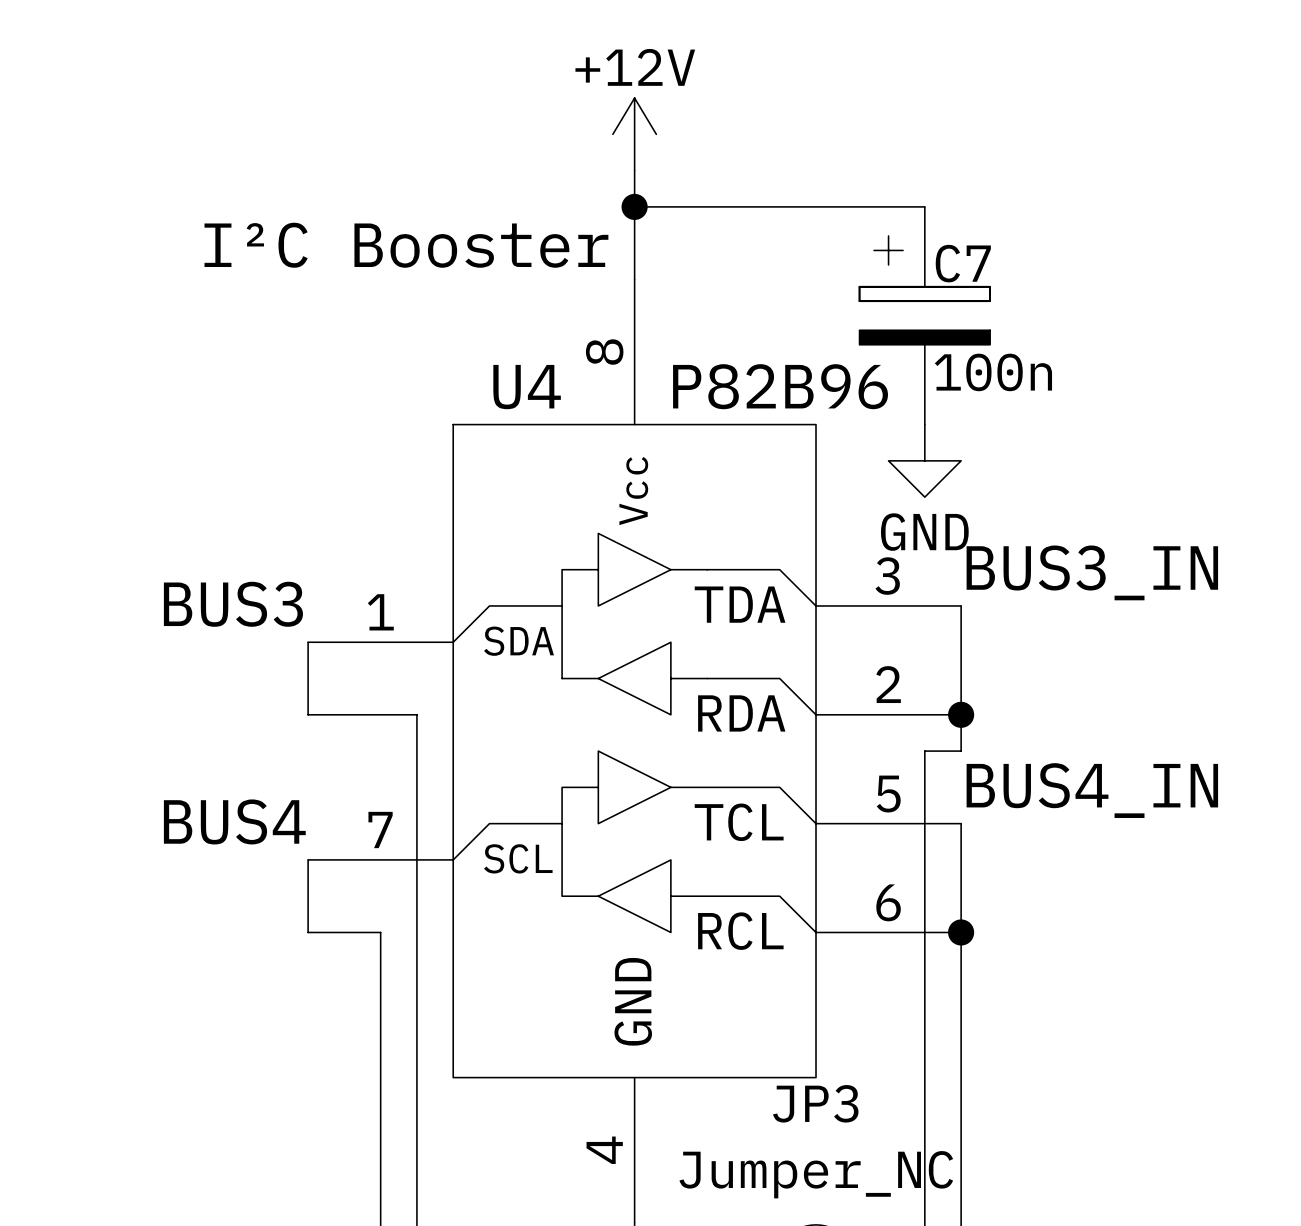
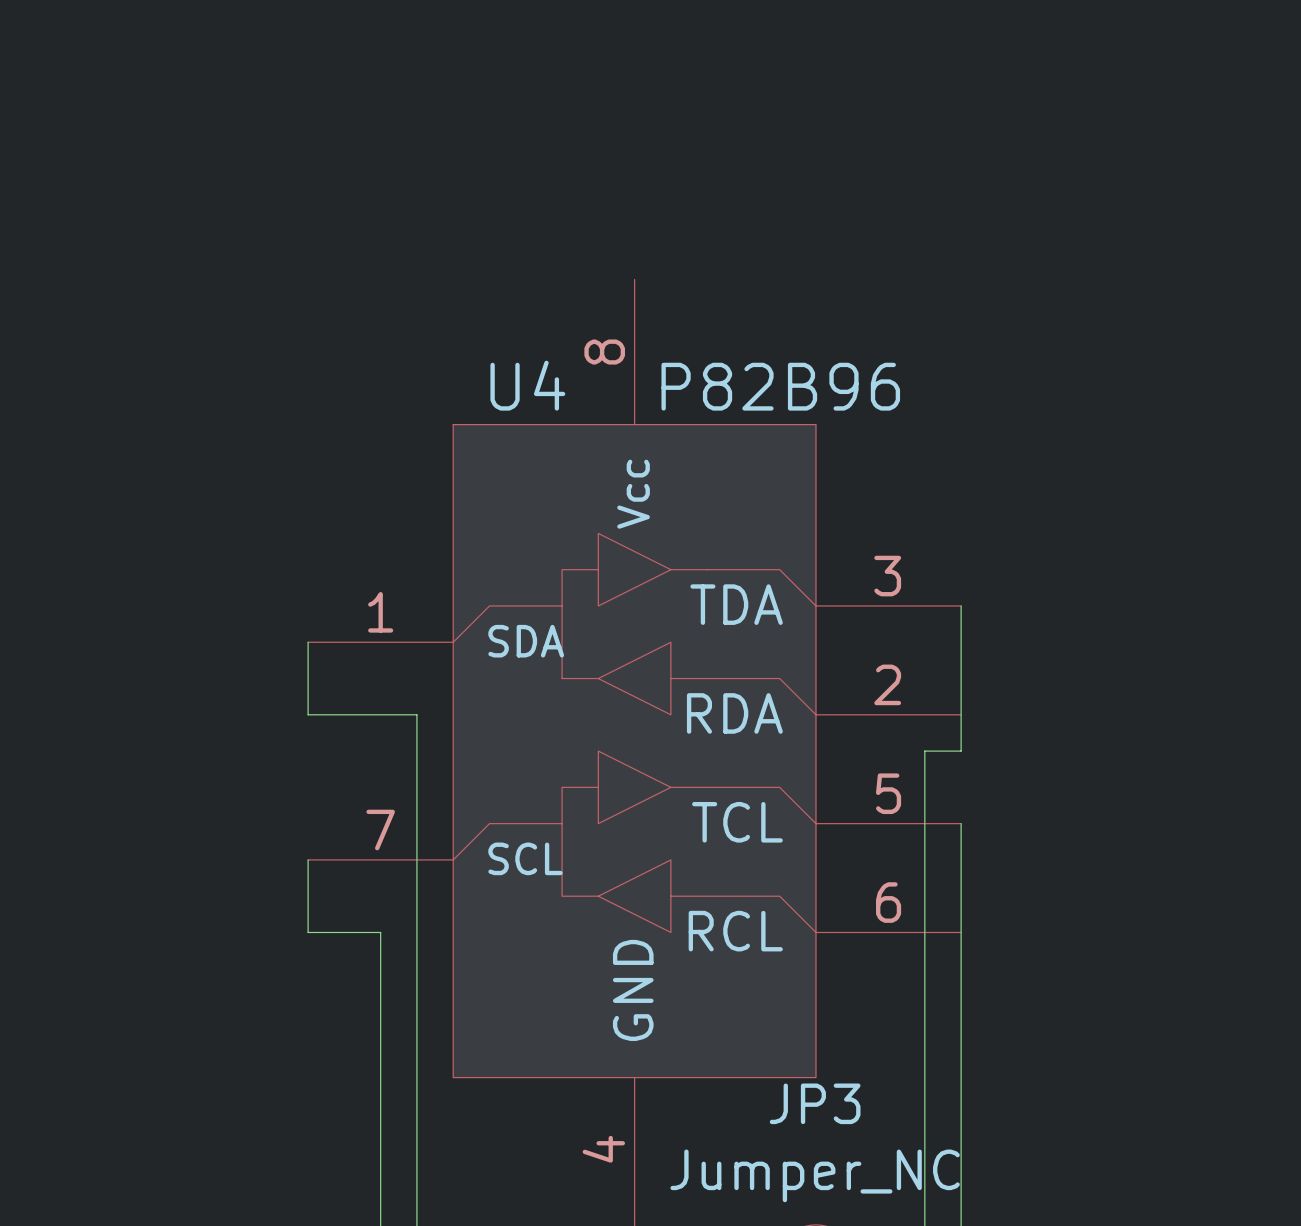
power symbol: +12V (634, 134) -> none
wire: (634, 170) (634, 279) -> none
wire: (634, 206) (924, 206) -> none
junction: (634, 206) -> none
text: I²C Booster (406, 245) -> none
C7: 100n (924, 315) -> none
power symbol: GND (924, 460) -> none
label: BUS3_IN (1092, 572) -> none
label: BUS3 (233, 604) -> none
junction: (961, 714) -> none
label: BUS4_IN (1092, 790) -> none
label: BUS4 (234, 821) -> none
junction: (961, 932) -> none

